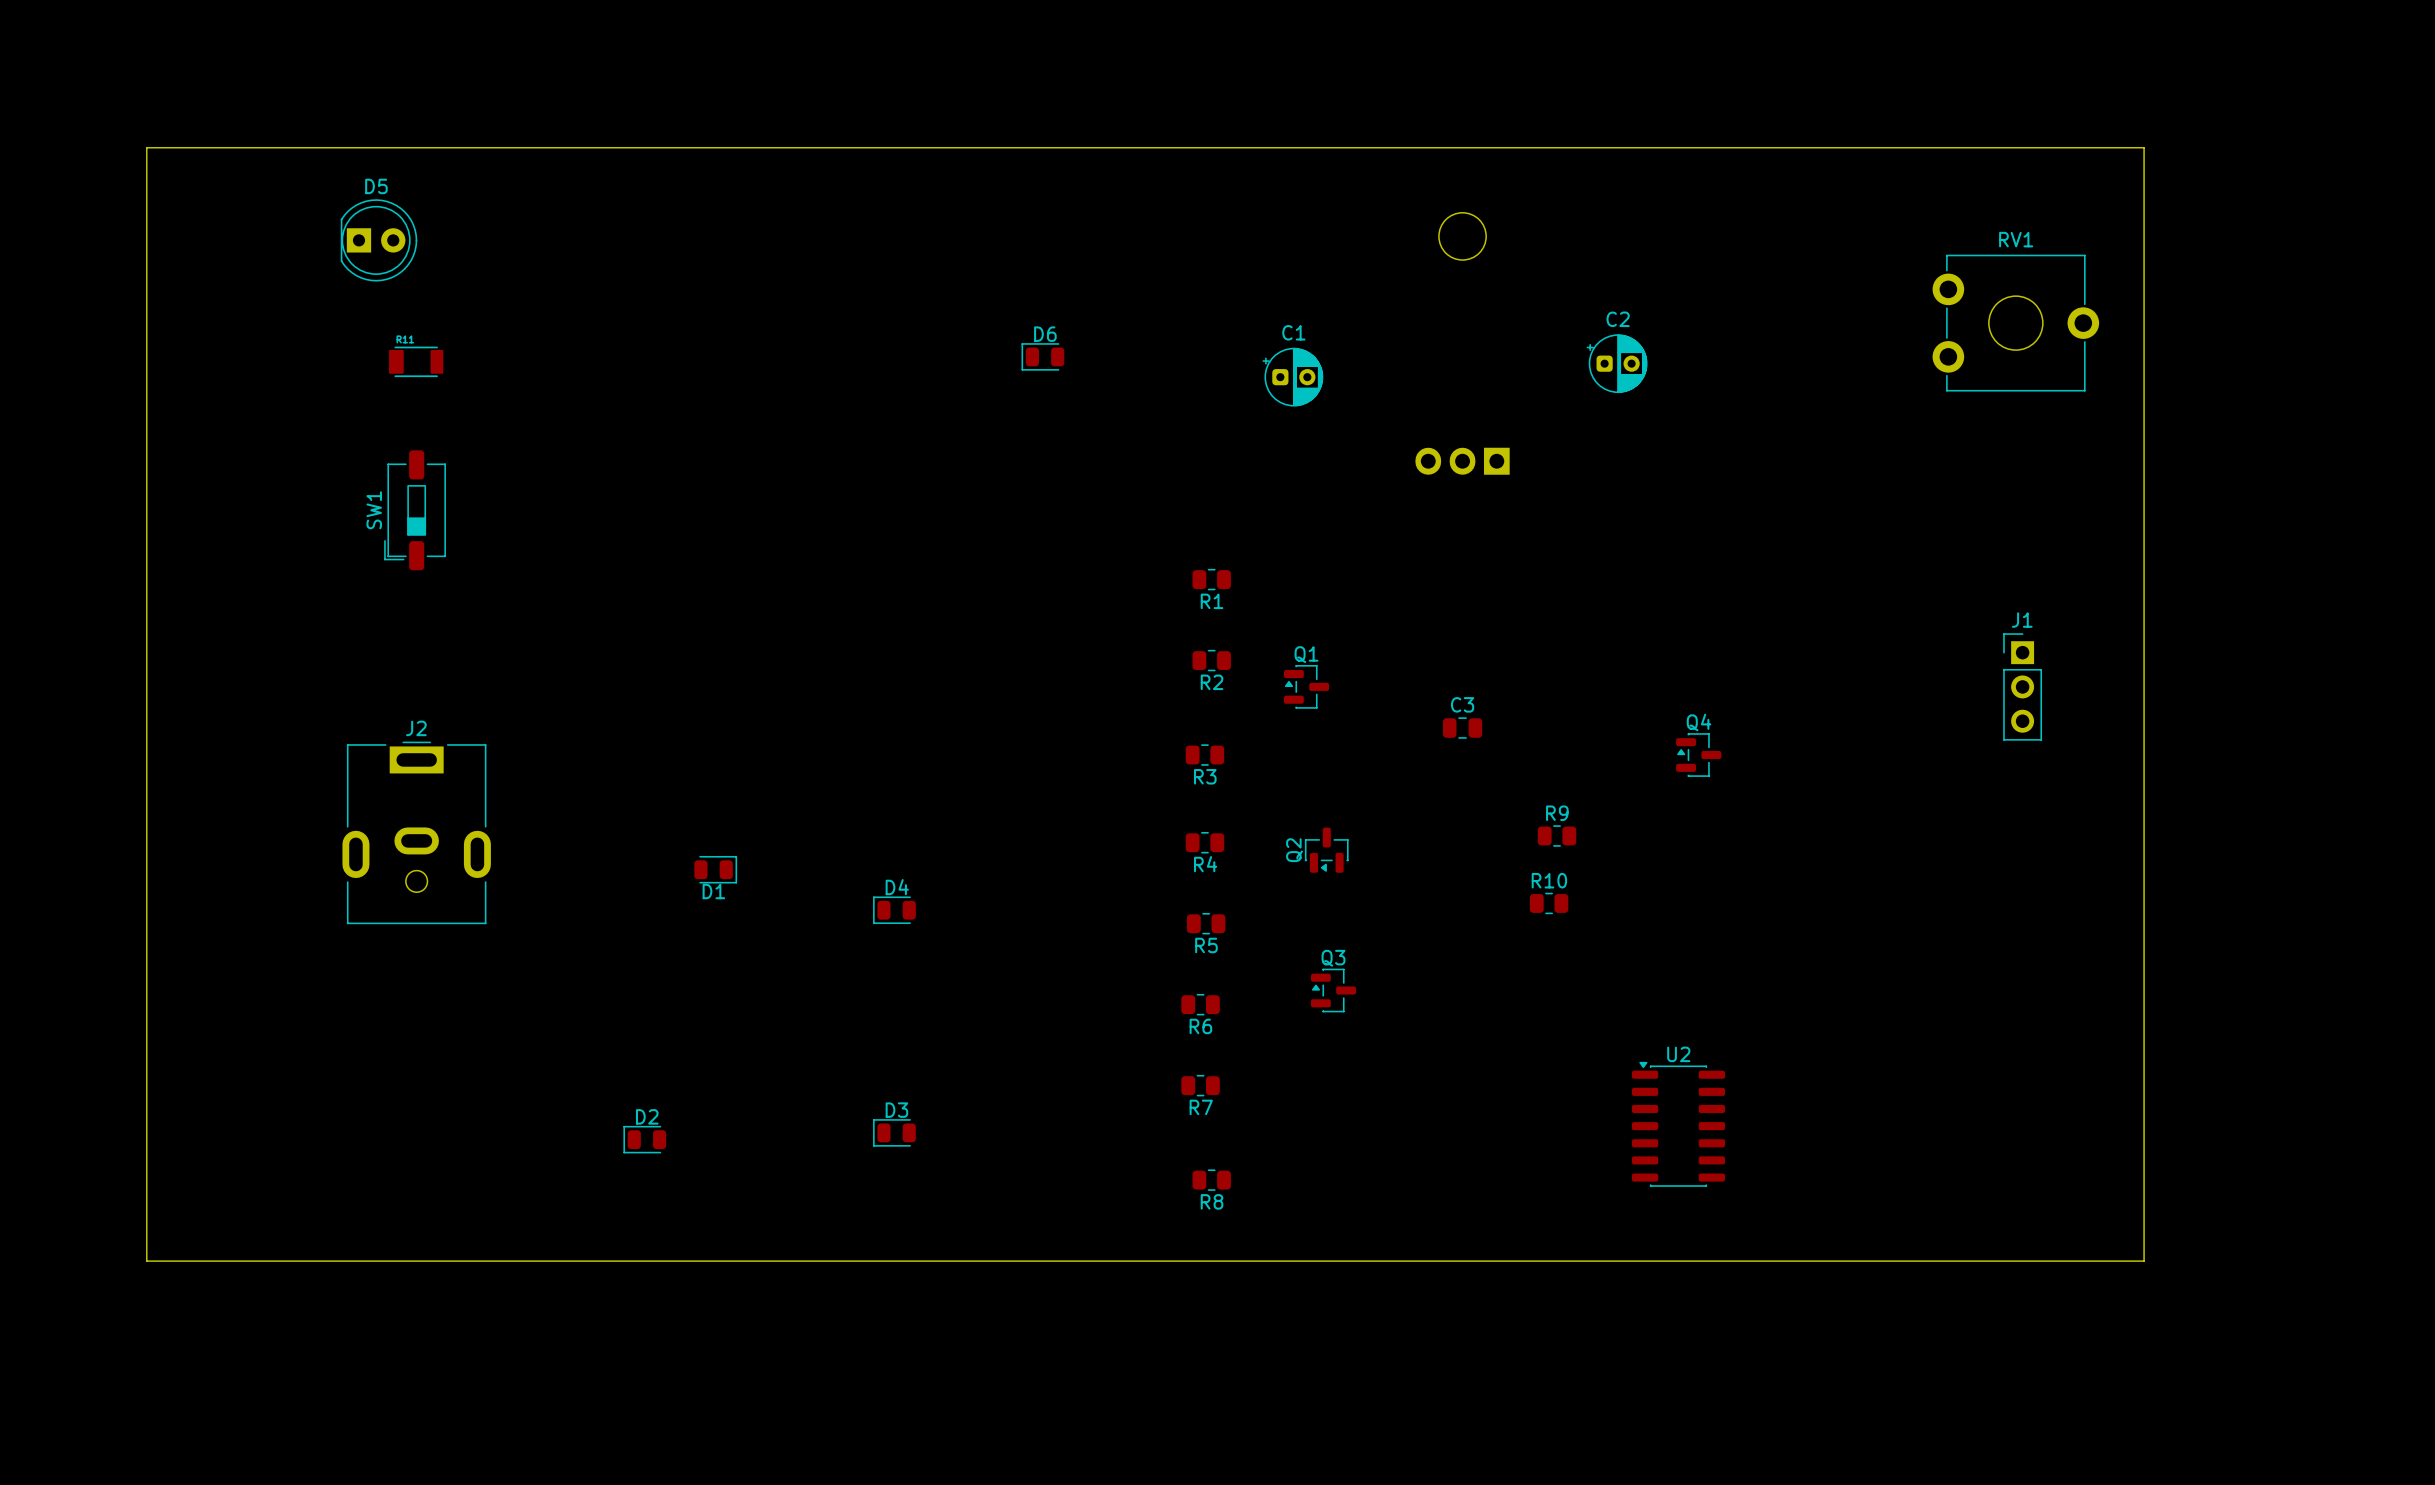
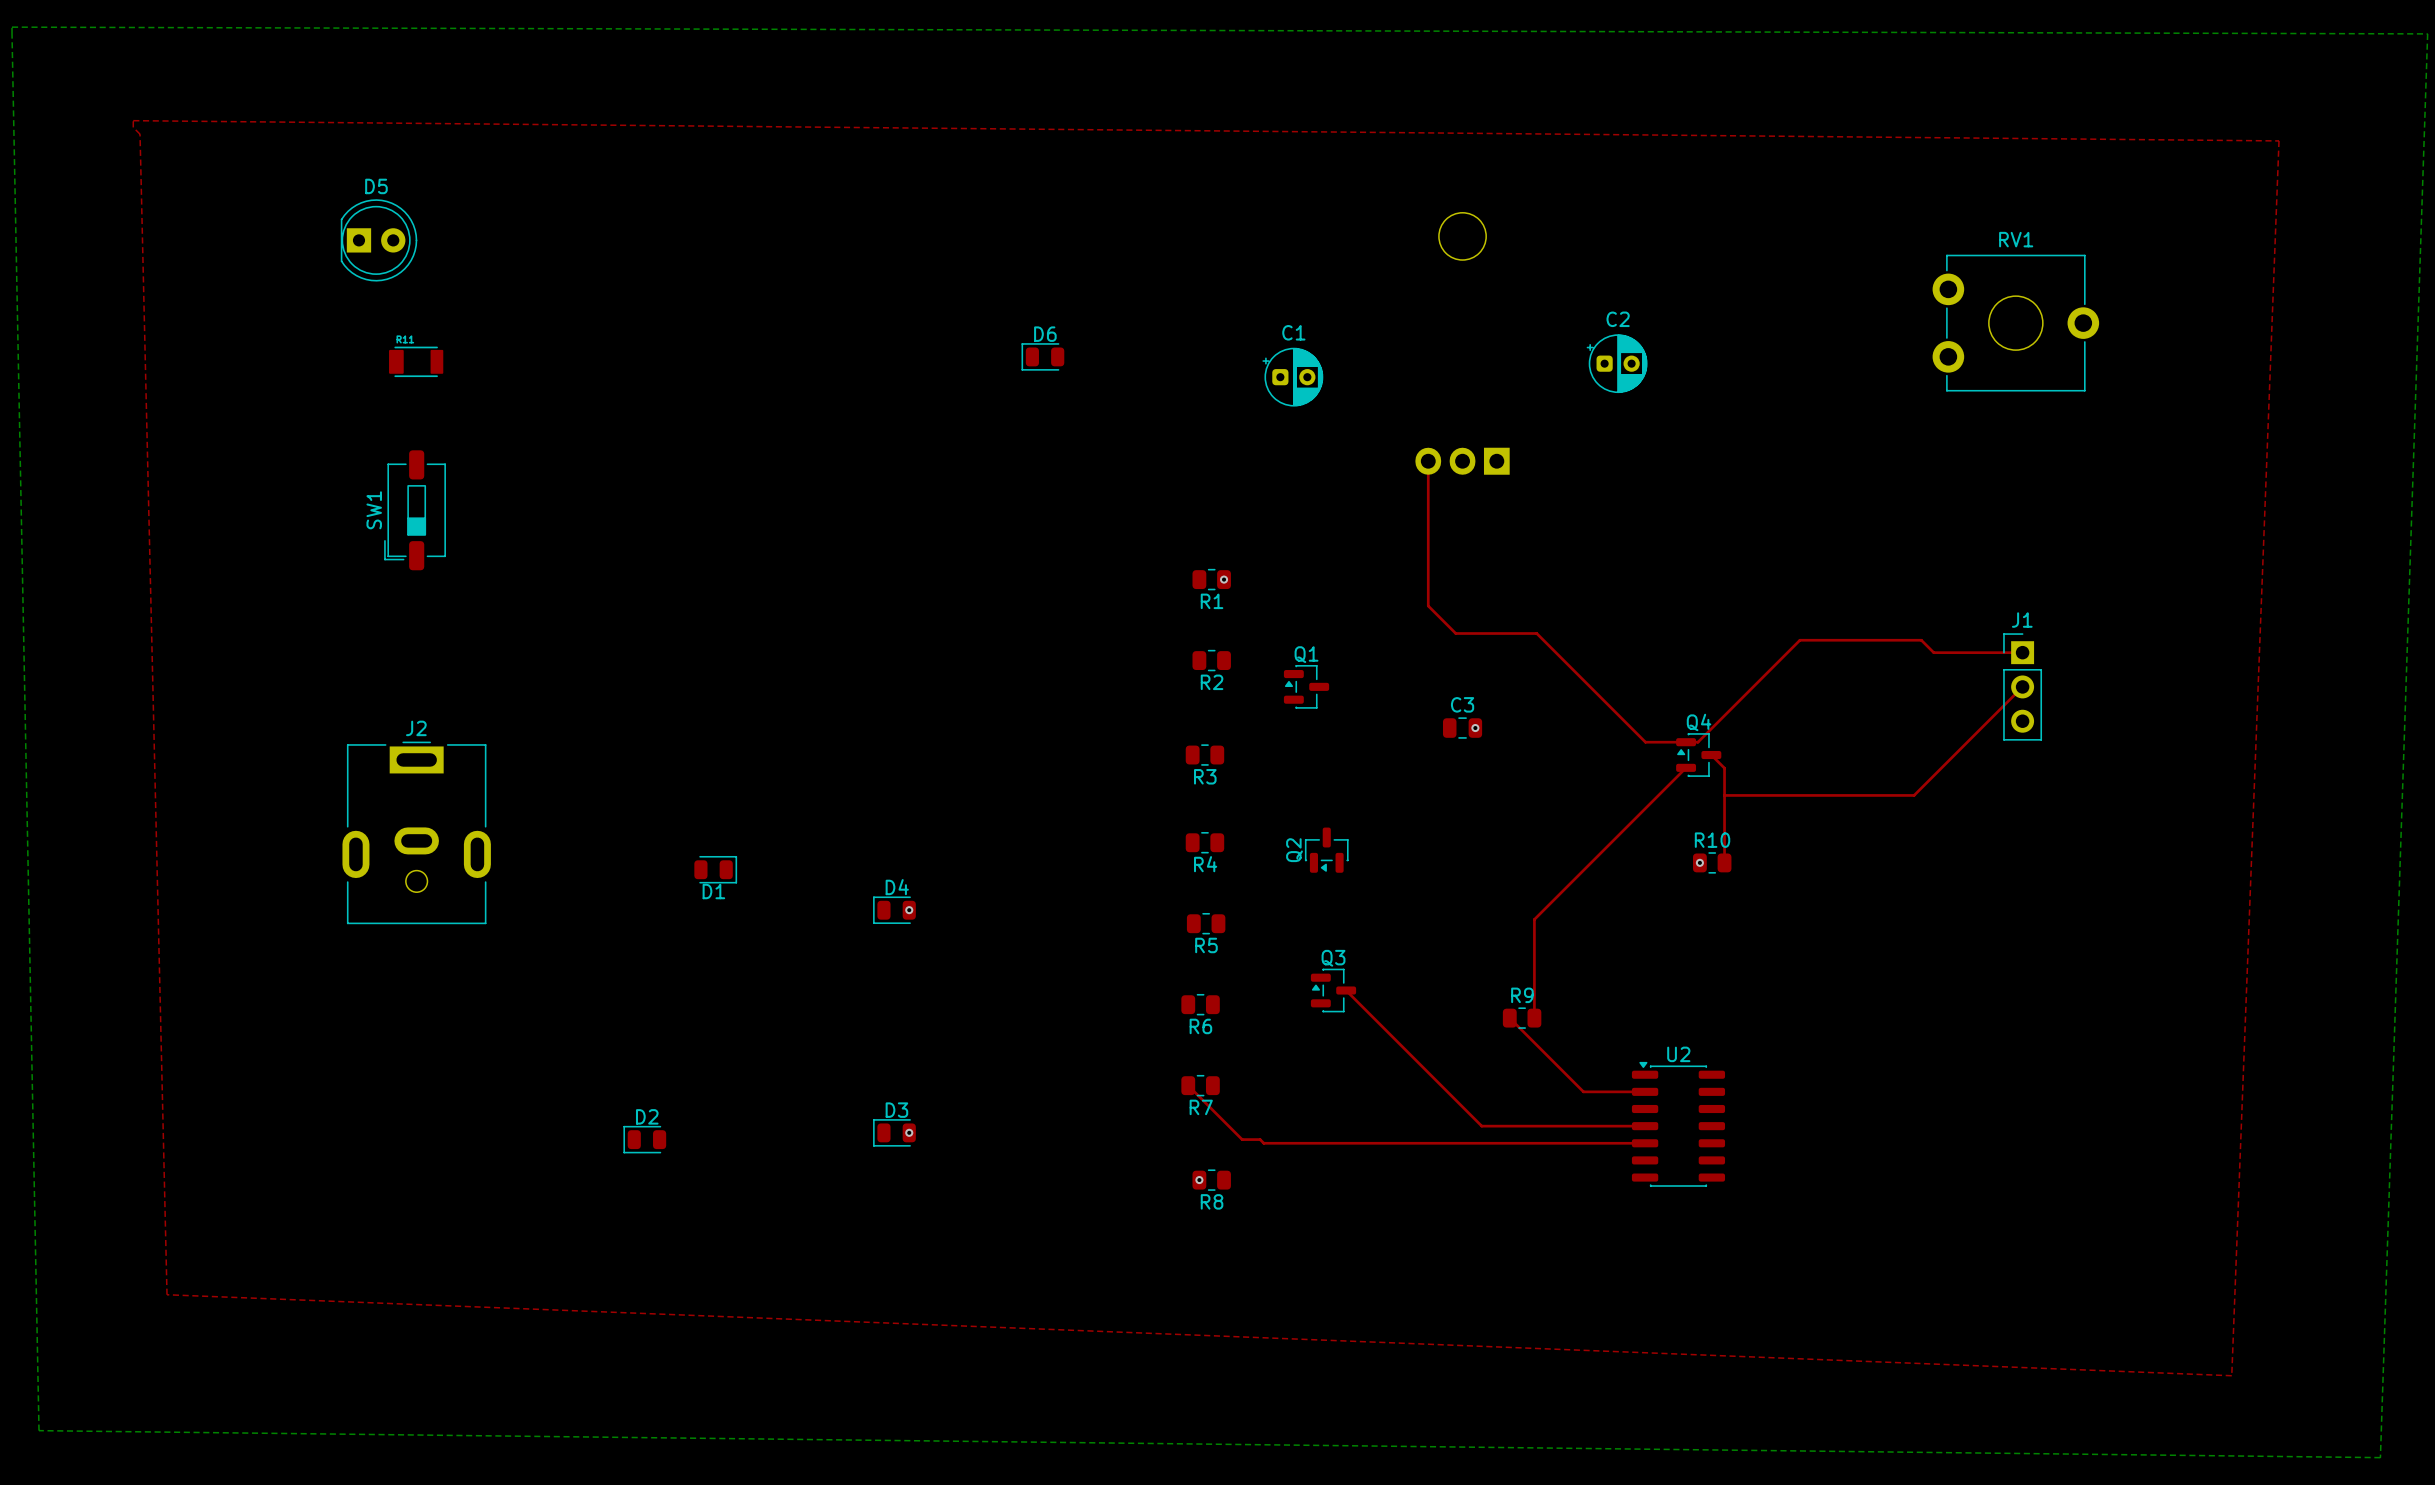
bottom zone outline: none -> (12, 27) (2427, 33) (2380, 1457) (39, 1430) (12, 27)
top zone outline: none -> (133, 120) (2279, 140) (2231, 1375) (167, 1294) (140, 134) (133, 127) (133, 120)
board edge: (146, 147) (2144, 147) (2144, 1261) (146, 1261) (146, 147) -> none
top track: none -> (1428, 461) (1428, 605) (1455, 633) (1536, 633) (1645, 742) (1697, 742) (1799, 640) (1921, 640) (1933, 652) (2022, 652)
via: none -> (1224, 579)
top track: none -> (2022, 686) (1914, 795) (1724, 795)
via: none -> (1475, 728)
top track: none -> (1711, 755) (1724, 768) (1724, 862)
top track: none -> (1686, 767) (1534, 919) (1534, 1018)
R9 position: (1557, 835) -> (1522, 1018)
via: none -> (1699, 862)
R10 position: (1549, 903) -> (1712, 862)
via: none -> (909, 910)
top track: none -> (1346, 990) (1481, 1126) (1645, 1126)
top track: none -> (1509, 1018) (1583, 1091) (1645, 1091)
top track: none -> (1188, 1085) (1242, 1139) (1260, 1139) (1263, 1143) (1645, 1143)
via: none -> (909, 1132)
via: none -> (1199, 1180)

